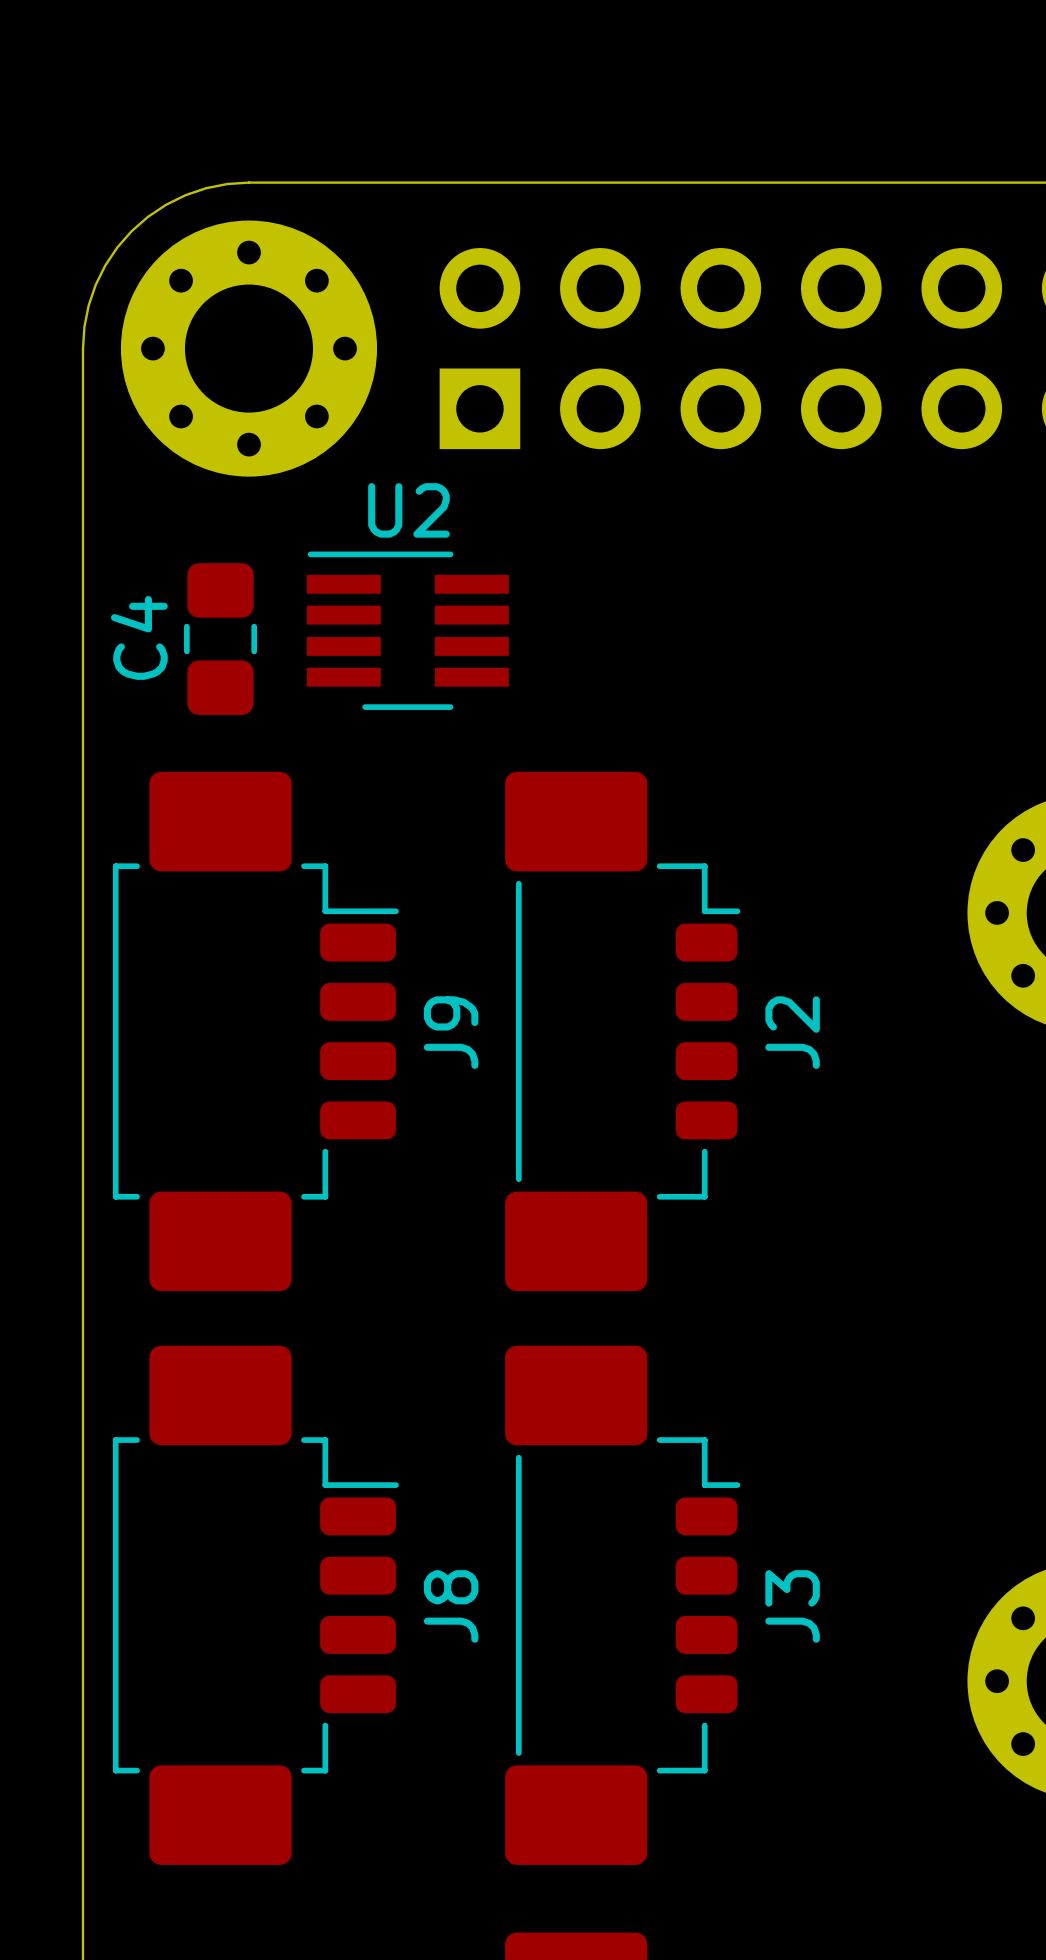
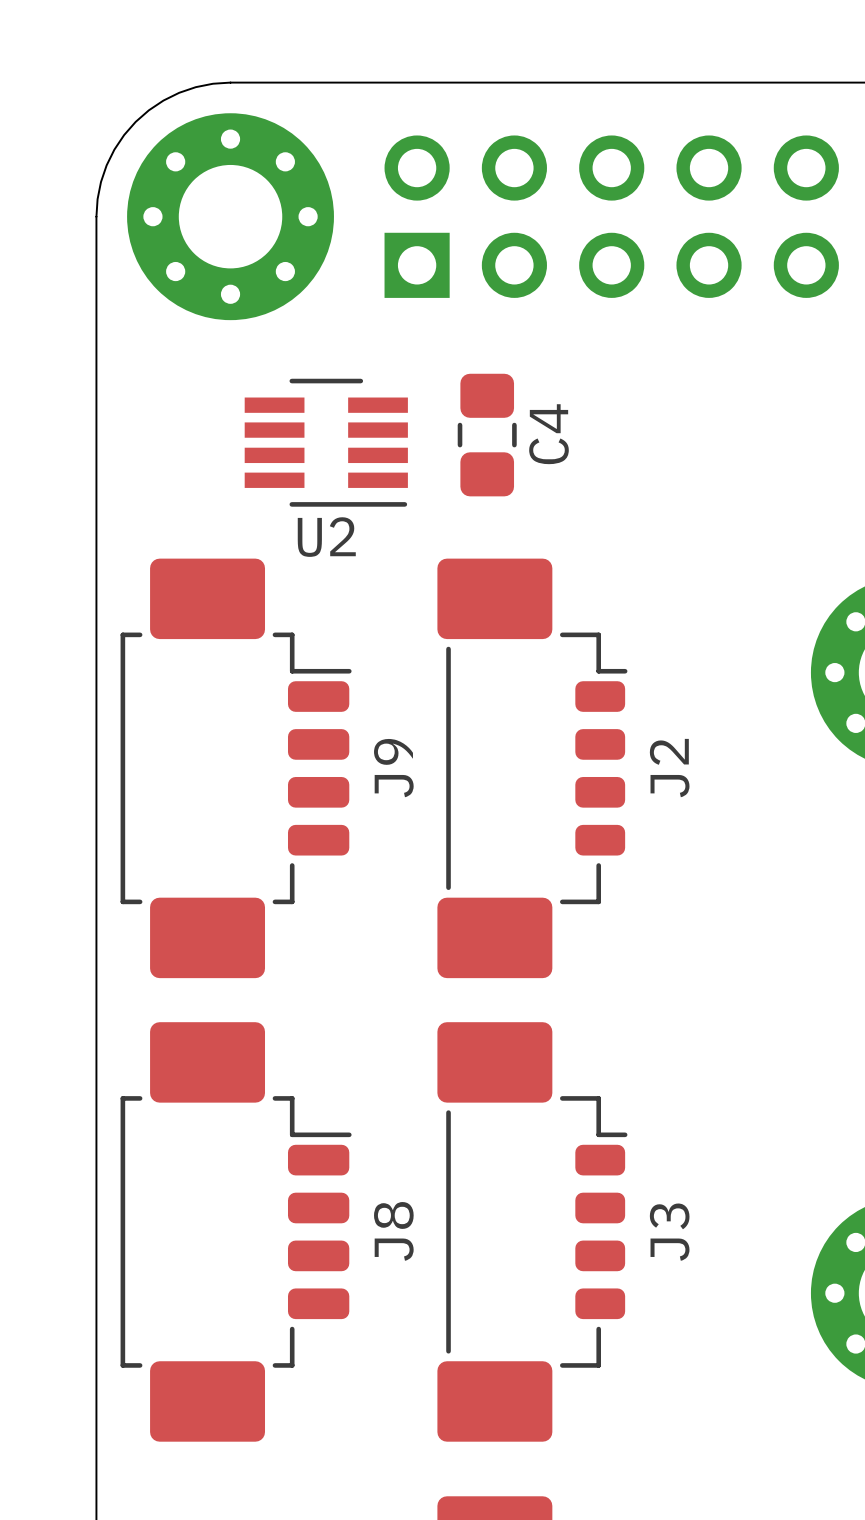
U2 rotation: 0° (407, 630) -> 180° (326, 442)
C4 name position: C4 (139, 637) -> C4 (548, 434)
C4 position: (220, 639) -> (487, 435)

